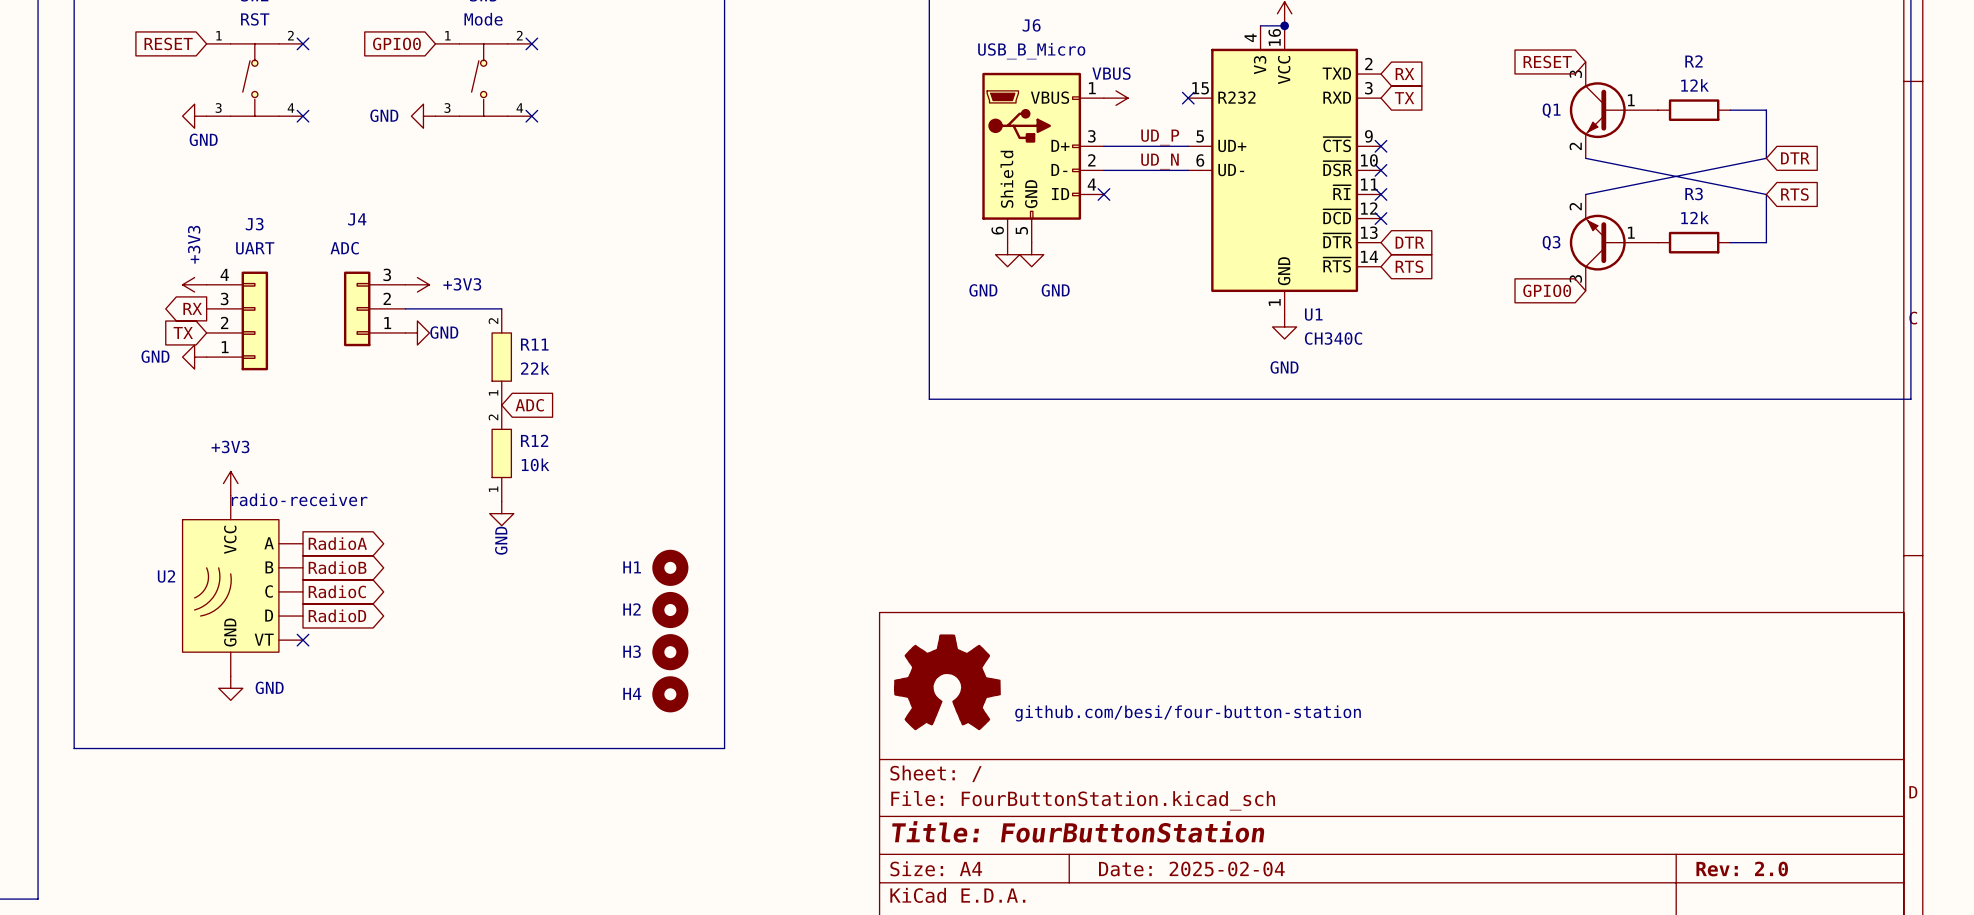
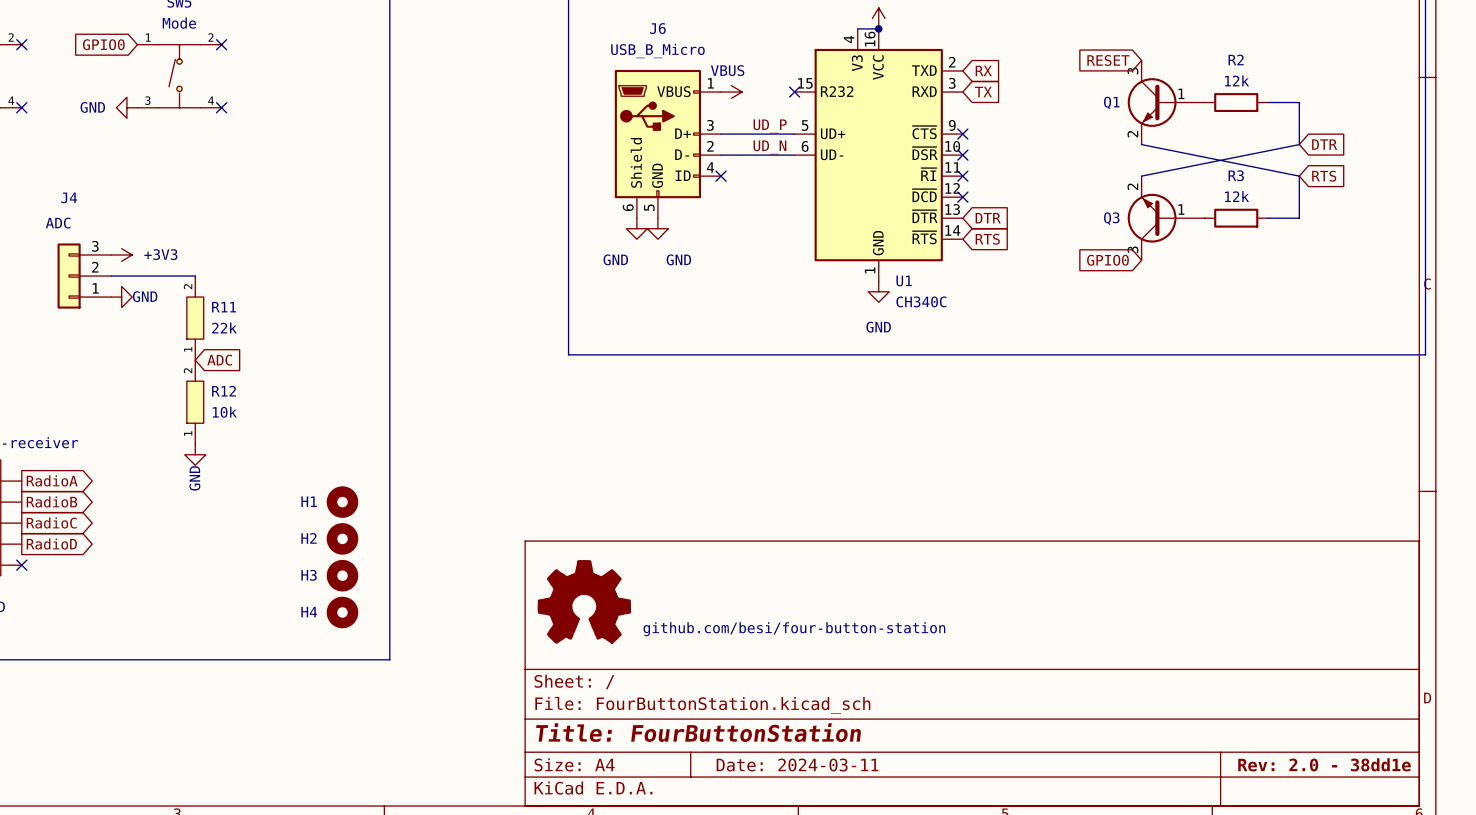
title block: Date: 2025-02-04 (1191, 869) -> Date: 2024-03-11 (797, 764)
title block: Rev: 2.0 (1742, 869) -> Rev: 2.0 - 38dd1e (1324, 764)

